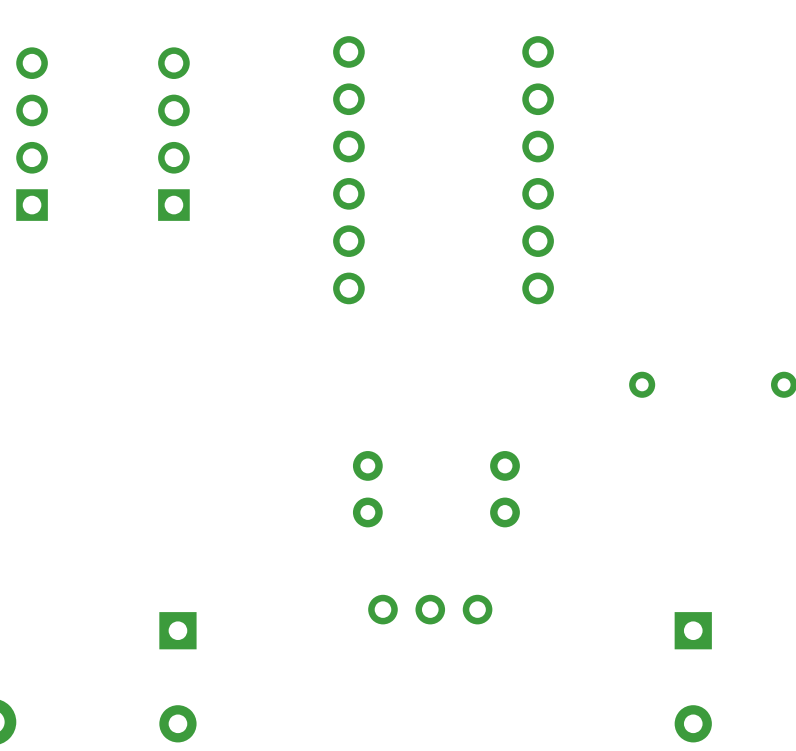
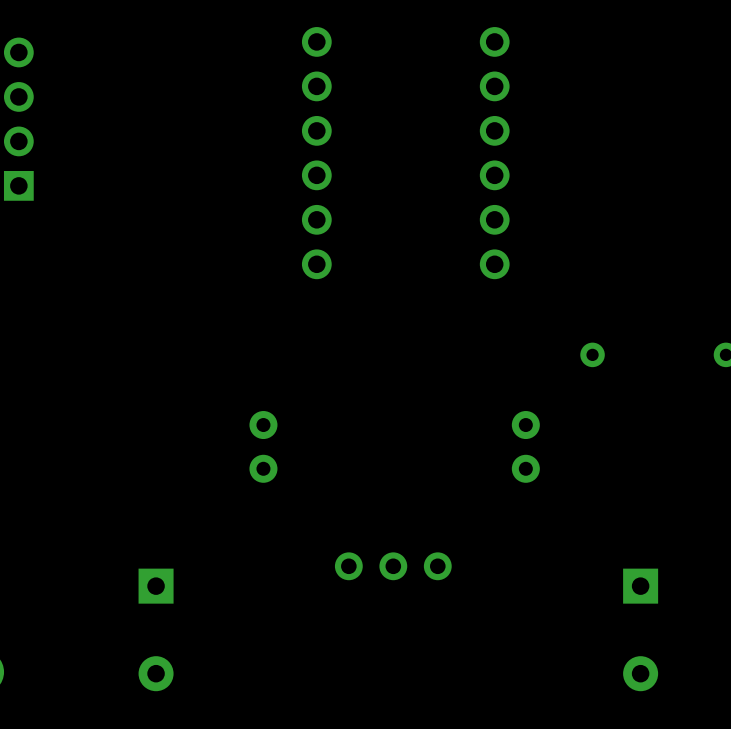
part: (173, 134) -> none
part position: (367, 489) -> (263, 446)
part position: (505, 489) -> (525, 446)

